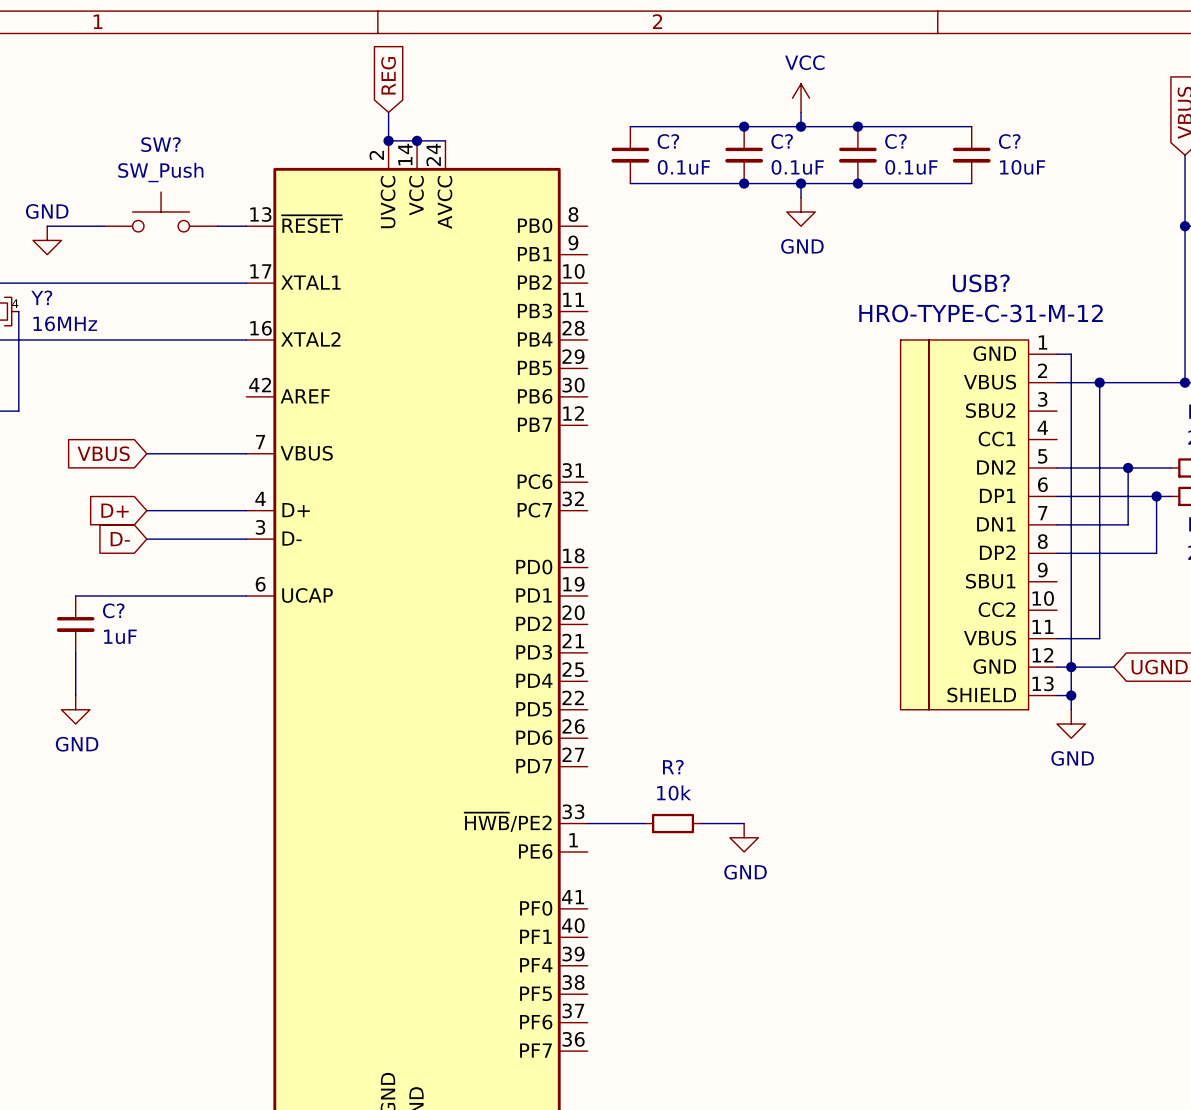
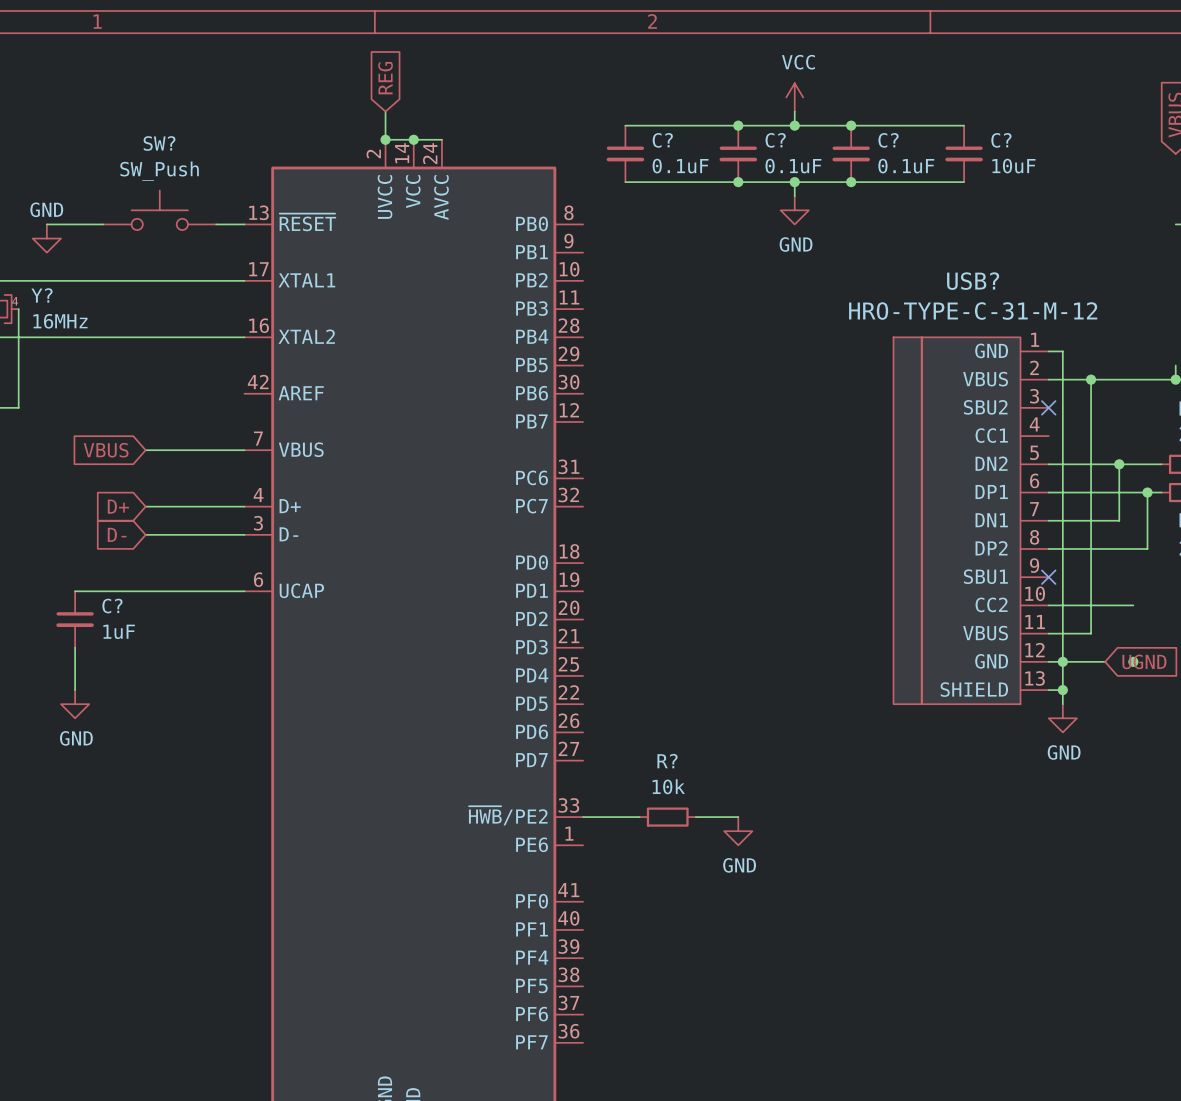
wire: (1185, 155) (1185, 368) -> none
junction: (1185, 226) -> none
no-connect mark: none -> (1048, 407)
no-connect mark: none -> (1048, 577)
wire: none -> (1048, 605) (1133, 605)
junction: none -> (1133, 661)

